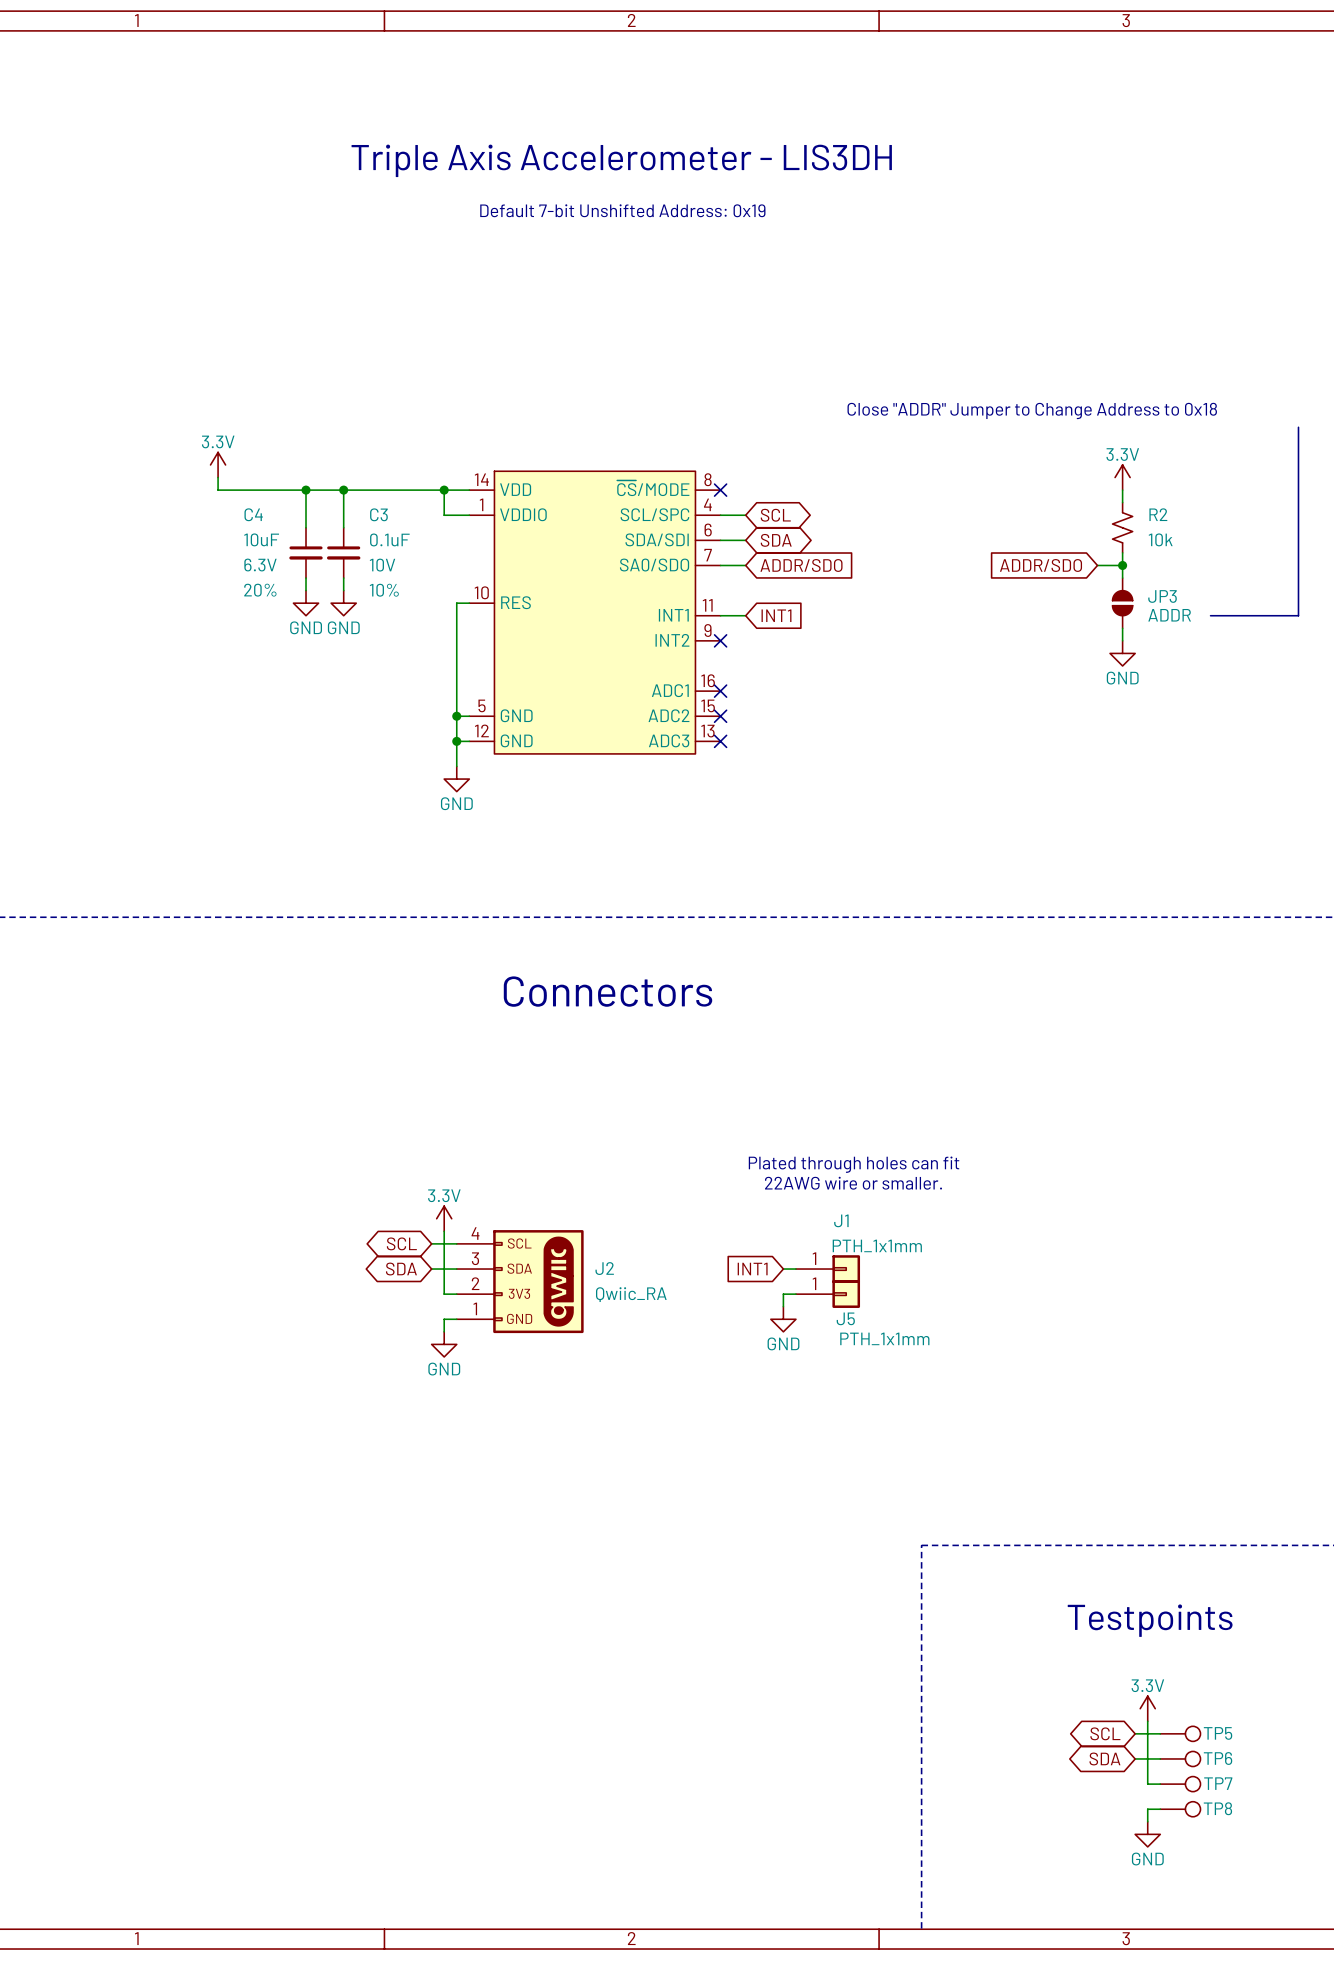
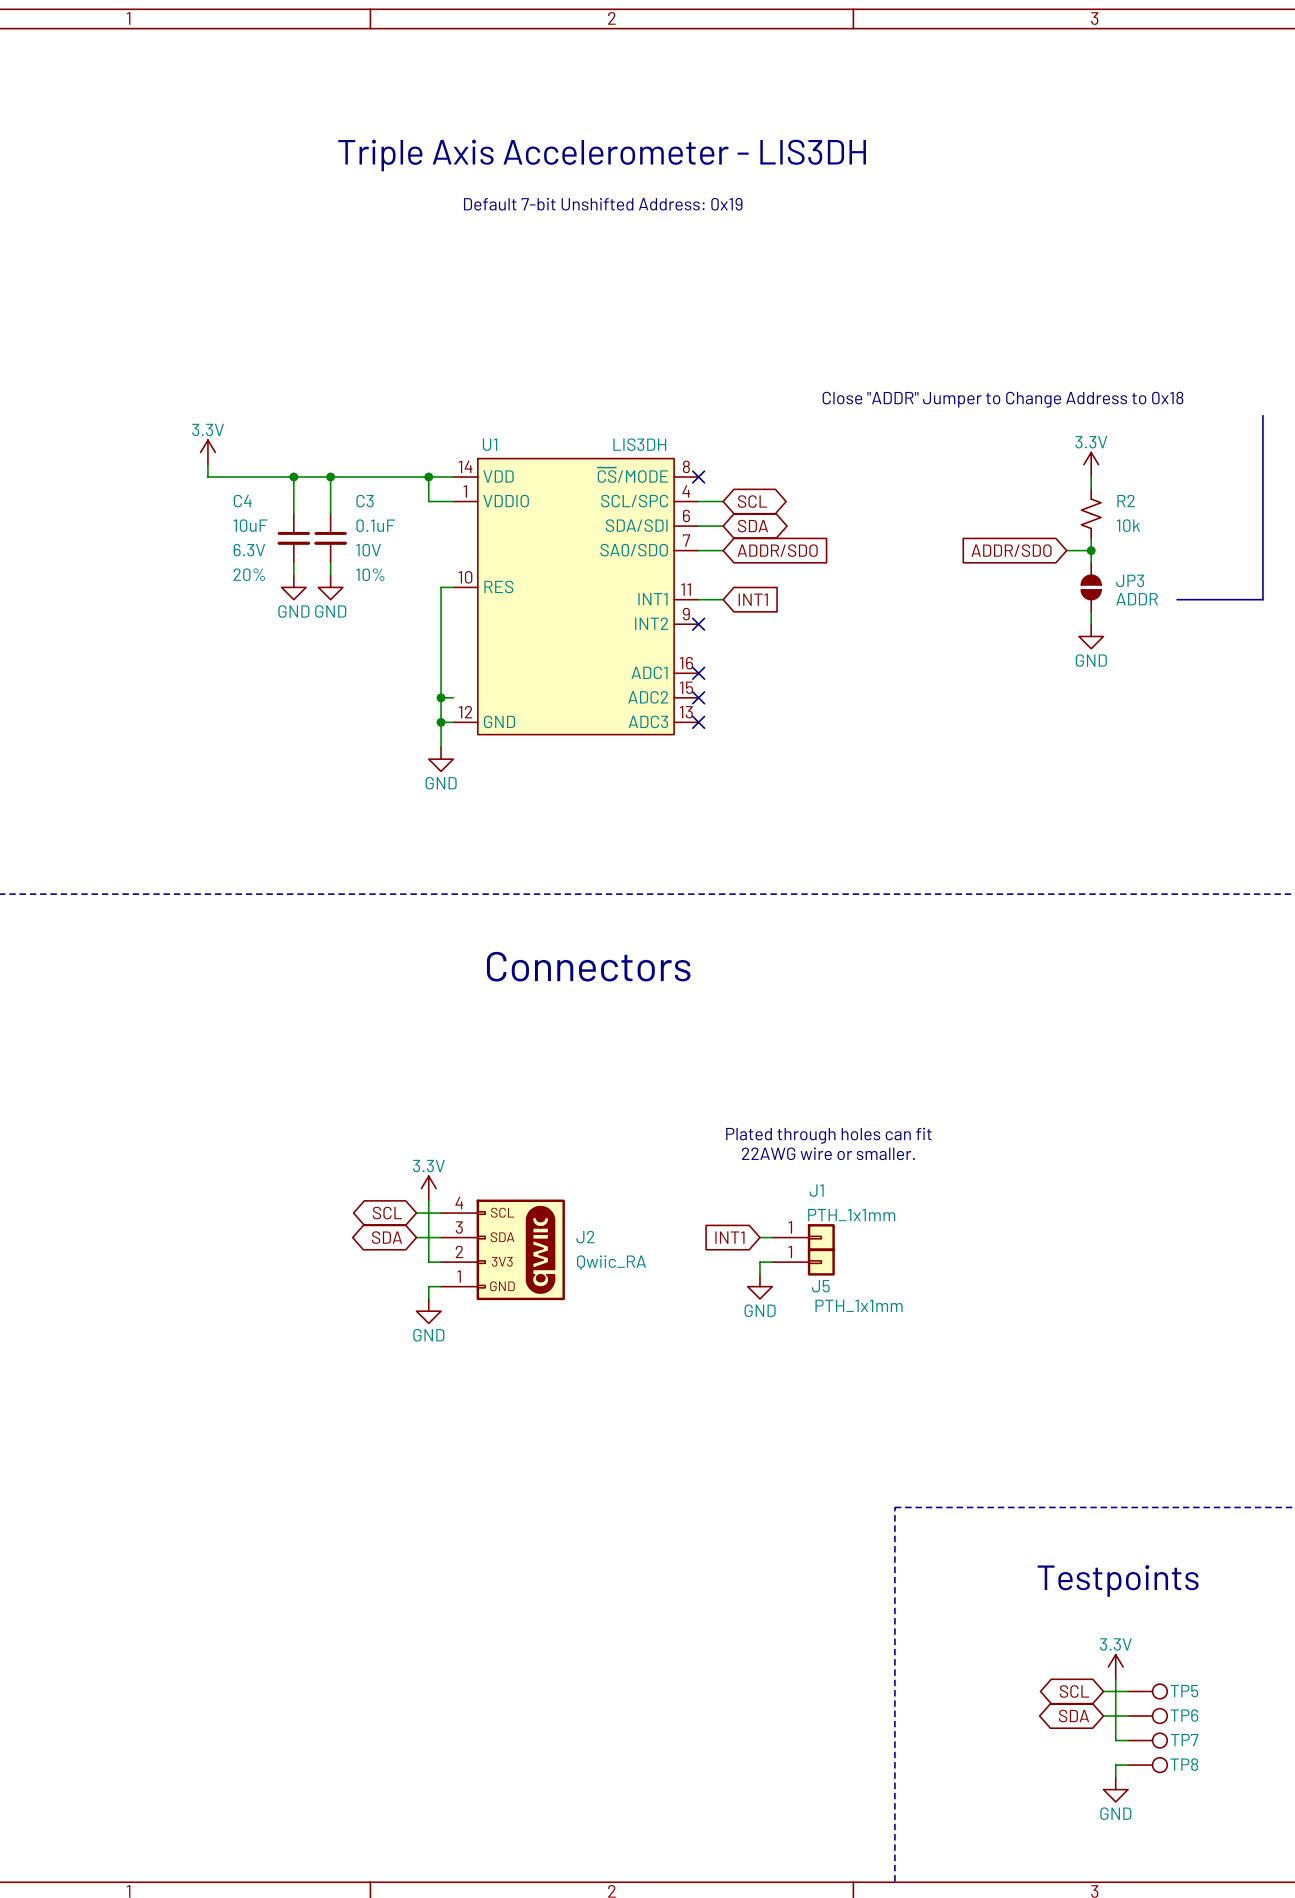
part: (594, 612) -> none
U1: none -> LIS3DH (575, 596)

